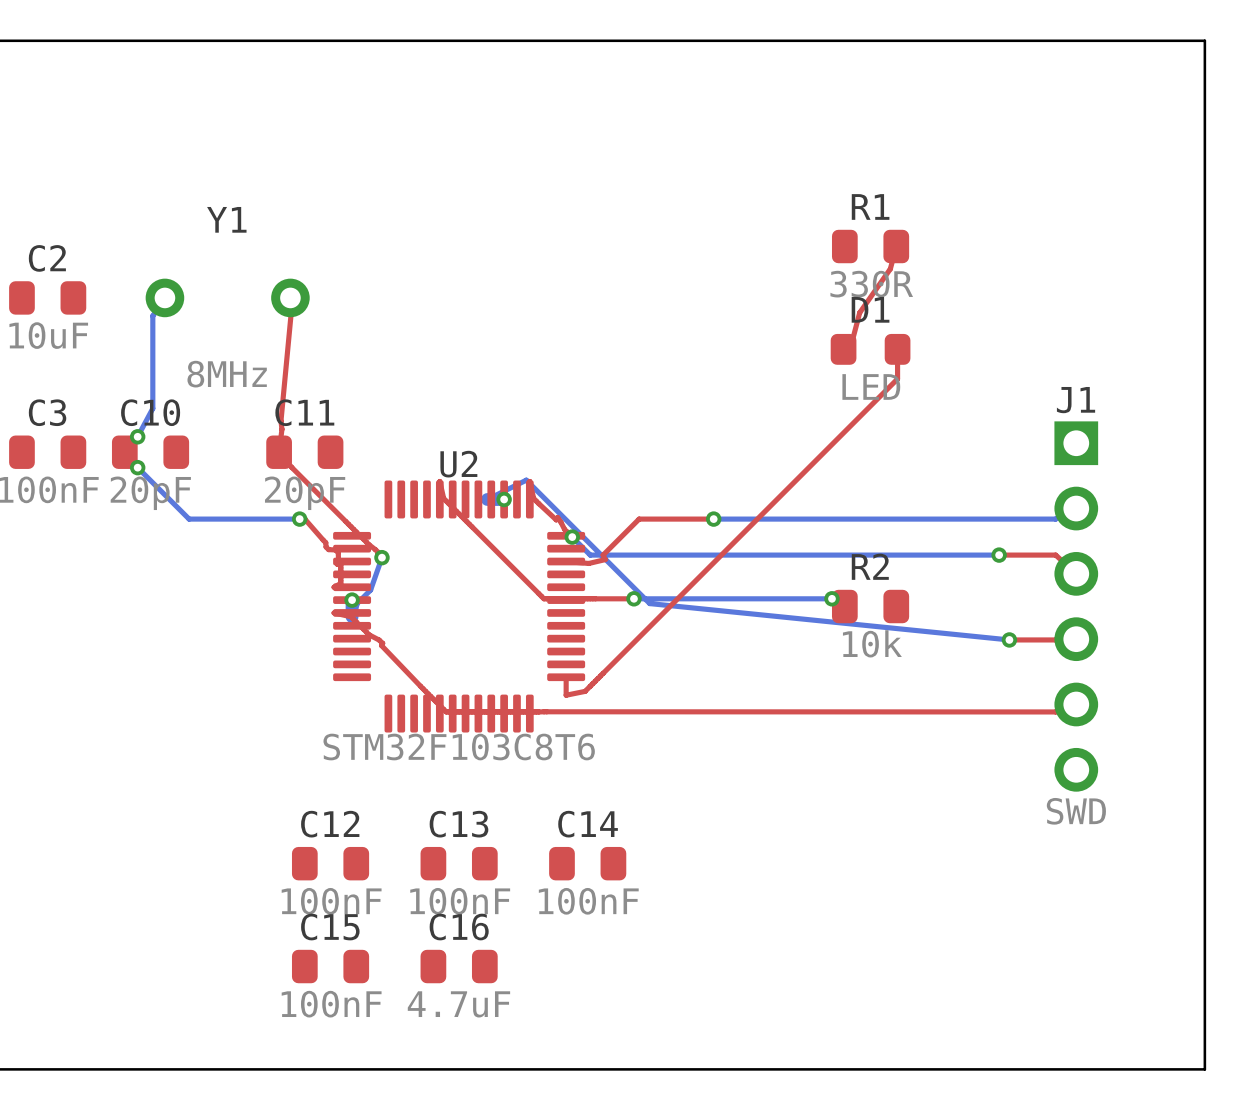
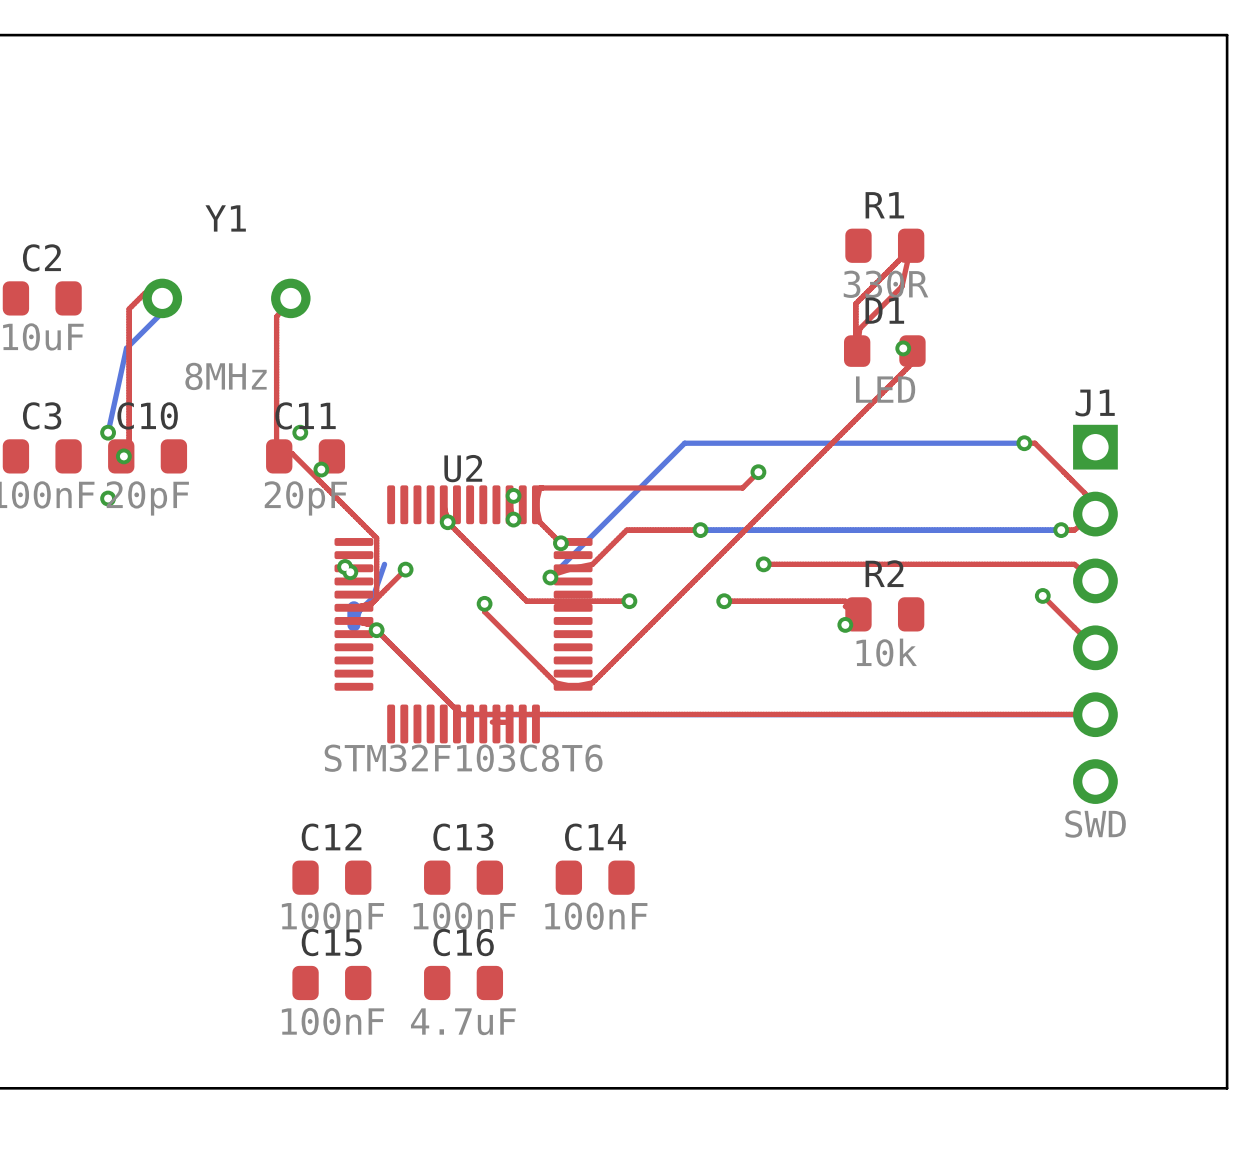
top track: (896, 246) (890, 268) (859, 312) (852, 339) (843, 349) -> (911, 245) (855, 303) (857, 351) (859, 328) (901, 286) (911, 245)
top track: none -> (162, 298) (144, 293) (129, 308) (129, 440) (121, 456)
bottom track: (164, 297) (152, 315) (152, 408) (137, 436) -> (162, 298) (163, 311) (126, 348) (108, 432)
top track: (290, 297) (290, 315) (279, 452) (291, 467) (381, 557) -> (290, 298) (276, 316) (276, 440) (279, 456) (292, 453) (376, 538) (376, 598)
top track: none -> (903, 348) (912, 351) (911, 364) (592, 682) (573, 686) (555, 682) (484, 611) (484, 603)
via: none -> (903, 348)
top track: (897, 349) (897, 378) (585, 691) (566, 695) (566, 677) -> none
via: none -> (108, 432)
via: none -> (300, 432)
via: (137, 436) -> none
top track: none -> (1024, 443) (1034, 443) (1084, 493) (1095, 514) (1074, 530) (1061, 530)
bottom track: none -> (1024, 443) (684, 443) (550, 577)
via: none -> (1024, 443)
via: none -> (123, 456)
via: none -> (321, 469)
bottom track: (137, 467) (189, 519) (299, 519) -> none
via: (137, 467) -> none
top track: none -> (758, 472) (742, 487) (539, 487) (535, 504) (539, 522) (560, 543)
via: none -> (758, 472)
via: none -> (513, 495)
via: none -> (108, 498)
top track: (439, 499) (439, 481) (443, 498) (543, 598) (633, 598) -> (443, 504) (447, 522) (526, 601) (629, 601)
bottom track: (504, 499) (487, 499) (526, 480) (649, 603) (1009, 639) -> none
via: (504, 499) -> none
top track: (529, 499) (529, 481) (533, 498) (556, 519) (557, 517) (564, 529) (572, 537) -> none
bottom track: (1076, 508) (1055, 519) (713, 519) -> none
via: none -> (513, 519)
via: none -> (447, 522)
top track: (299, 519) (304, 519) (325, 542) (328, 549) (335, 549) (338, 552) (337, 564) (340, 562) (340, 583) (334, 587) (352, 587) -> none
via: (299, 519) -> none
top track: (713, 519) (639, 519) (603, 555) (605, 559) (588, 563) (566, 561) -> none
via position: (713, 519) -> (700, 530)
top track: none -> (700, 530) (626, 530) (592, 564) (573, 568) (550, 577)
bottom track: none -> (700, 530) (1061, 530)
via: none -> (1061, 530)
bottom track: (572, 537) (590, 555) (999, 555) -> none
via position: (572, 537) -> (560, 543)
top track: (999, 555) (1055, 555) (1076, 573) -> (763, 564) (1074, 564) (1095, 580)
via: (999, 555) -> none
via: (381, 557) -> none
via: none -> (763, 564)
via: none -> (345, 566)
top track: none -> (405, 569) (371, 603) (353, 607)
via: none -> (405, 569)
via: none -> (350, 572)
via: none -> (550, 577)
via: none -> (1042, 595)
top track: none -> (724, 601) (845, 601) (858, 614) (845, 624)
via: none -> (724, 601)
via: none -> (484, 603)
bottom track: (633, 598) (831, 598) -> none
via position: (633, 598) -> (629, 601)
via position: (831, 598) -> (845, 624)
via: (352, 600) -> none
top track: (352, 612) (334, 612) (351, 616) (369, 634) (379, 640) (382, 643) (381, 645) (446, 711) (487, 711) -> none
via: none -> (376, 630)
via: (1009, 639) -> none
top track: (1076, 639) (1009, 639) -> (1095, 647) (1042, 595)
top track: (1076, 704) (1055, 711) (500, 711) -> (1095, 714) (460, 714) (371, 624) (353, 620)

